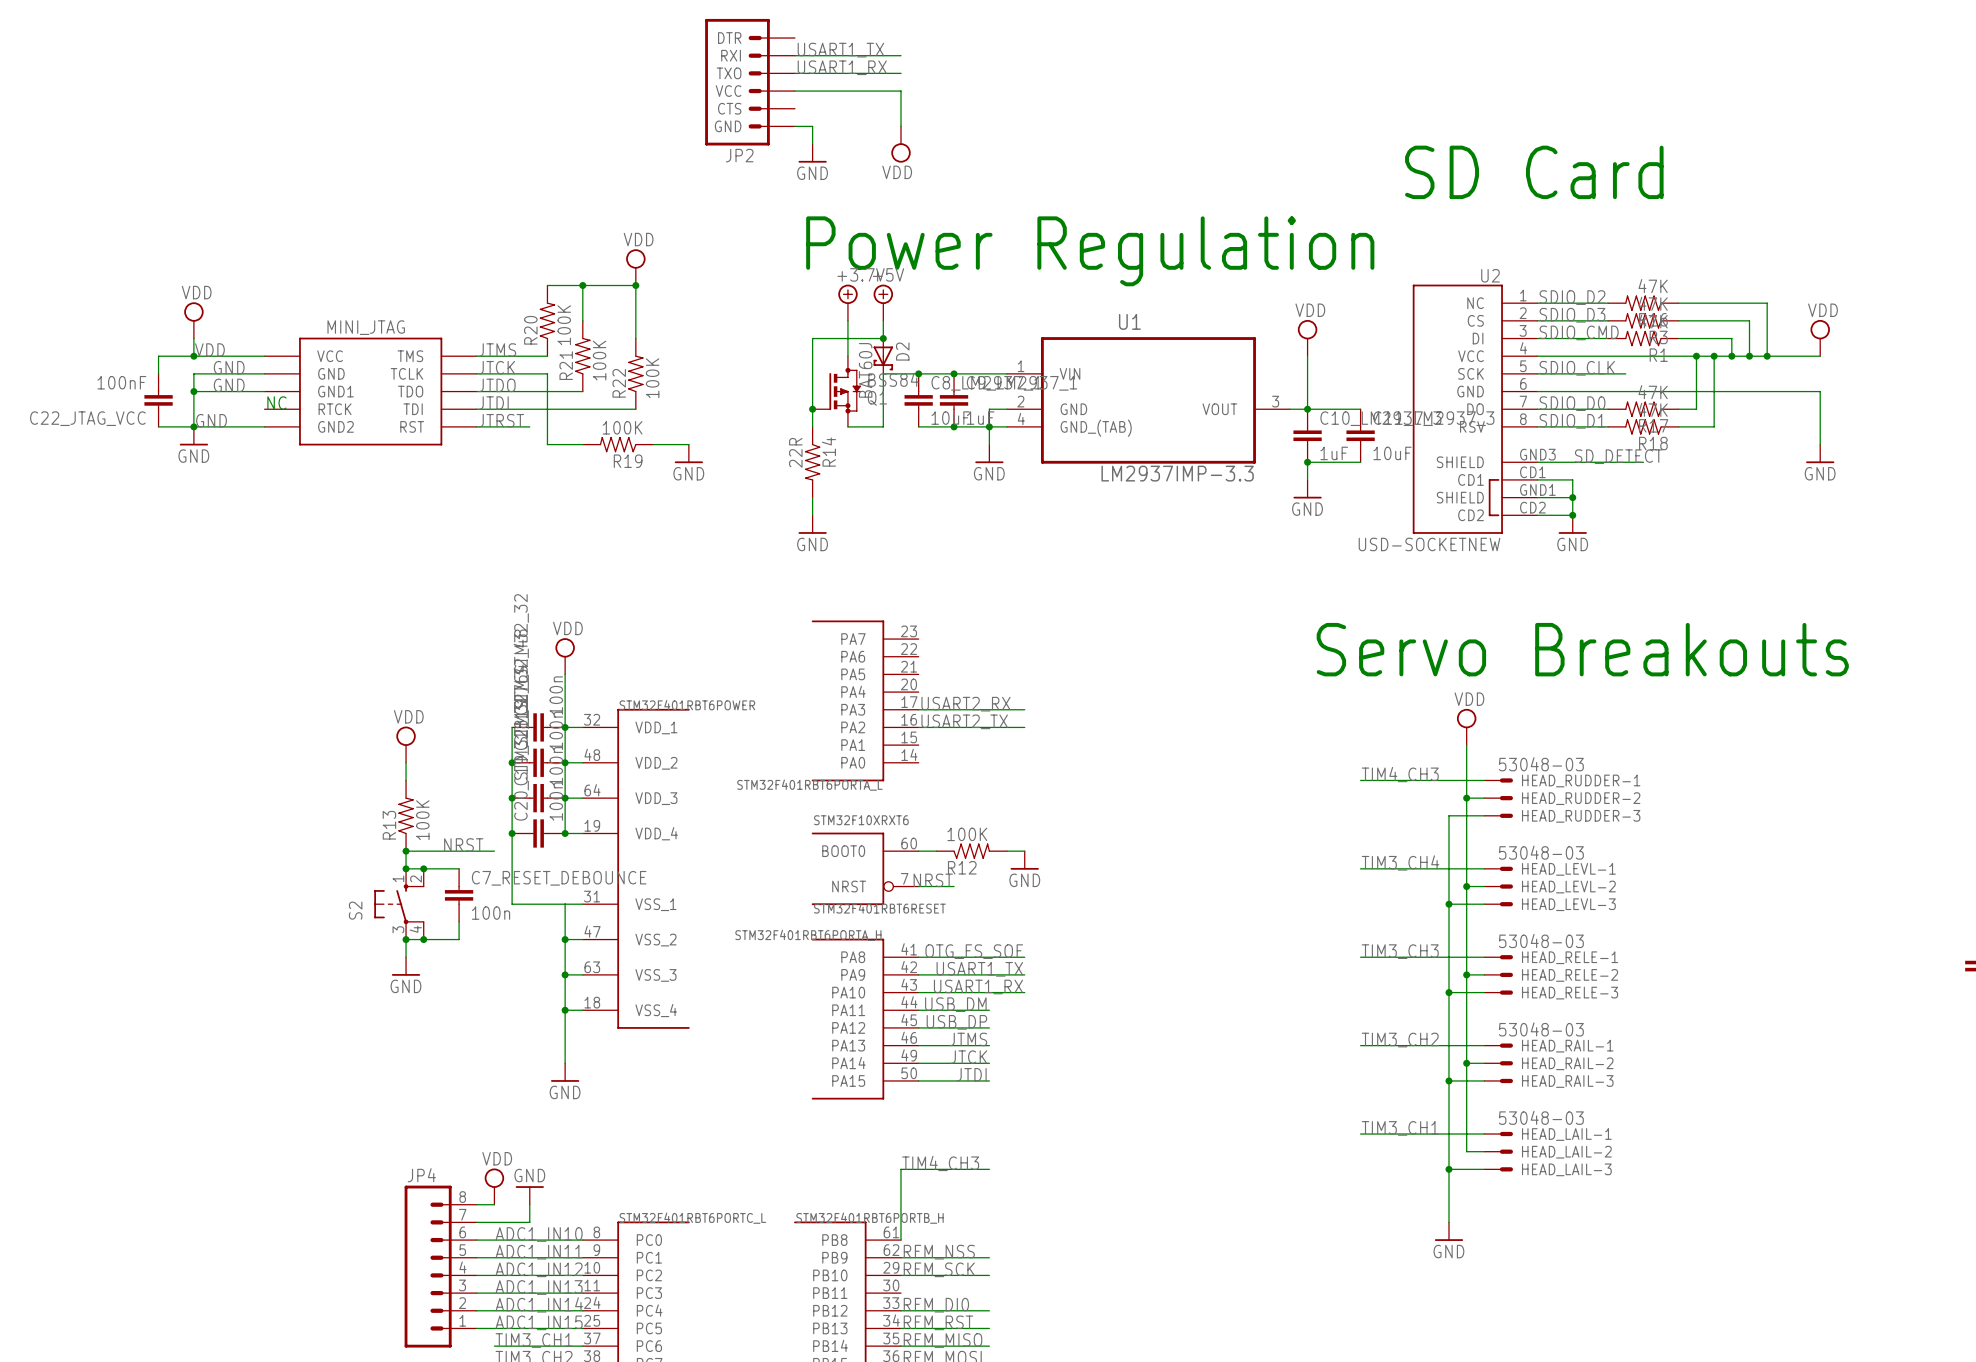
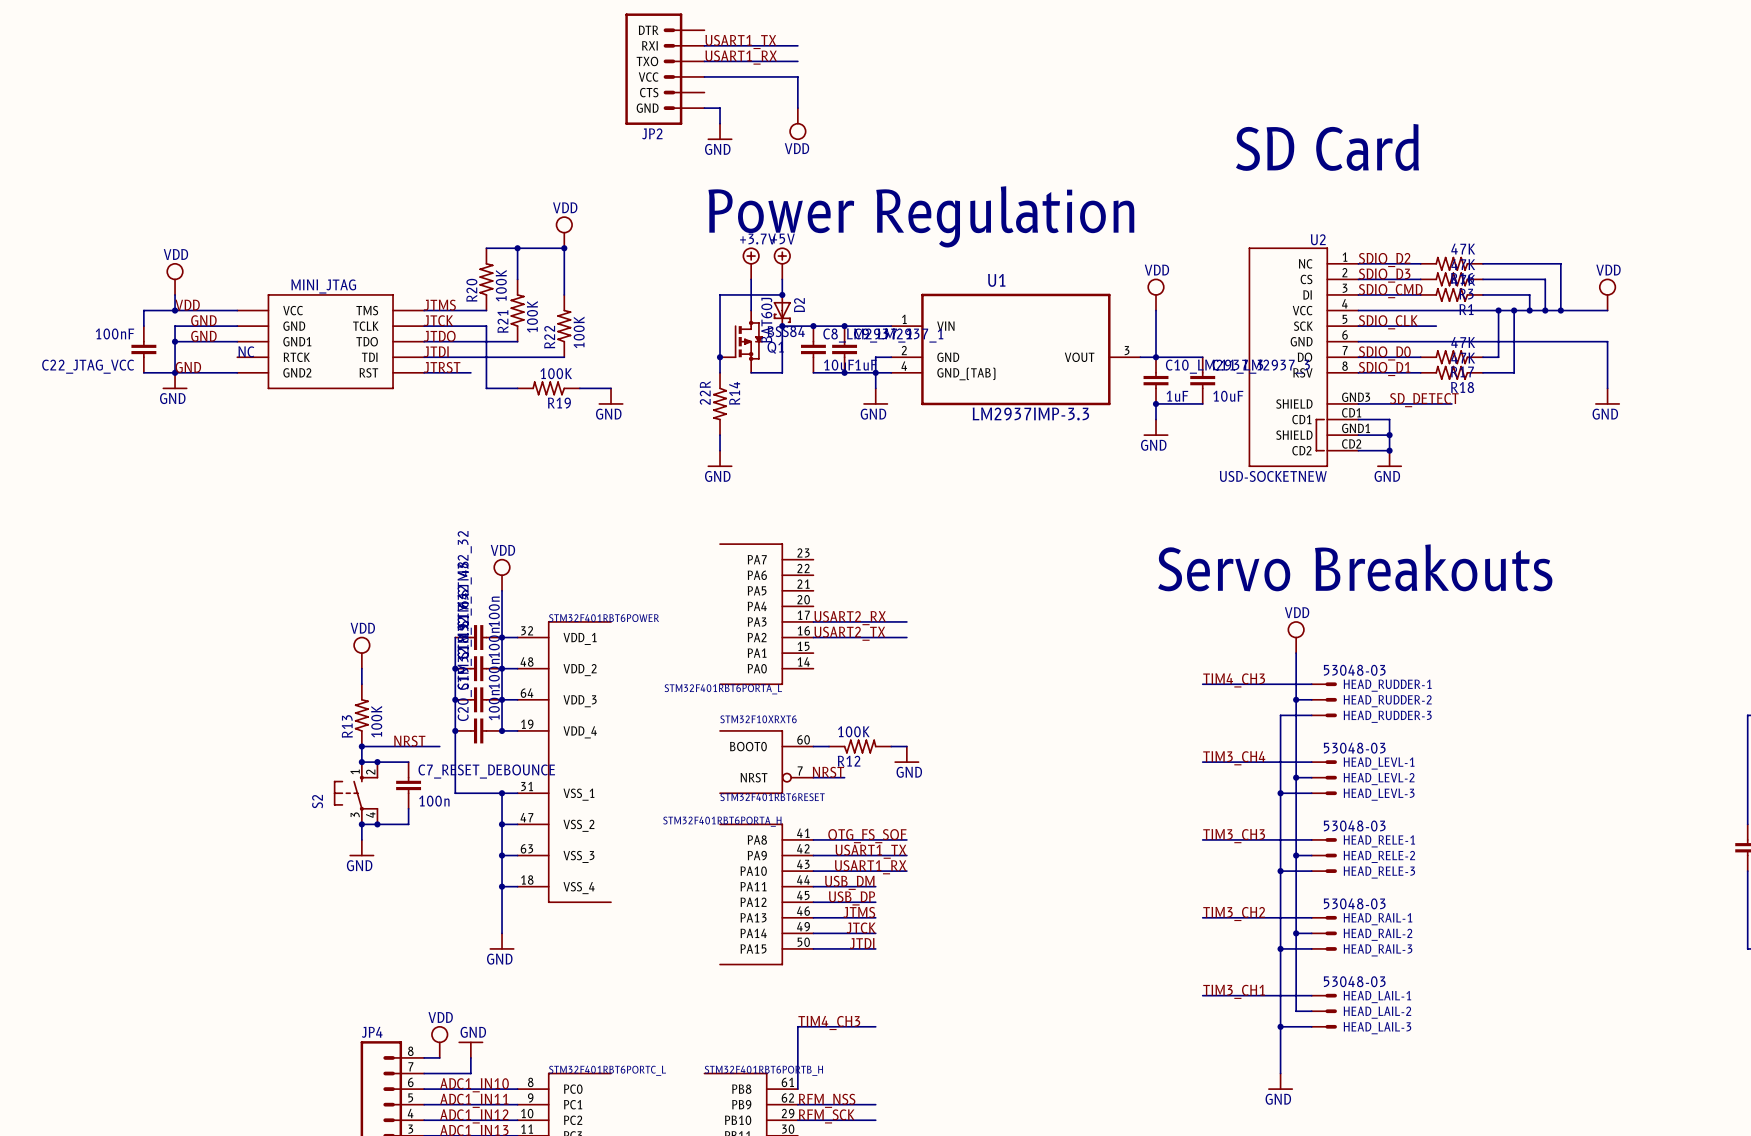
junction: none -> (782, 326)
junction: none -> (502, 793)

